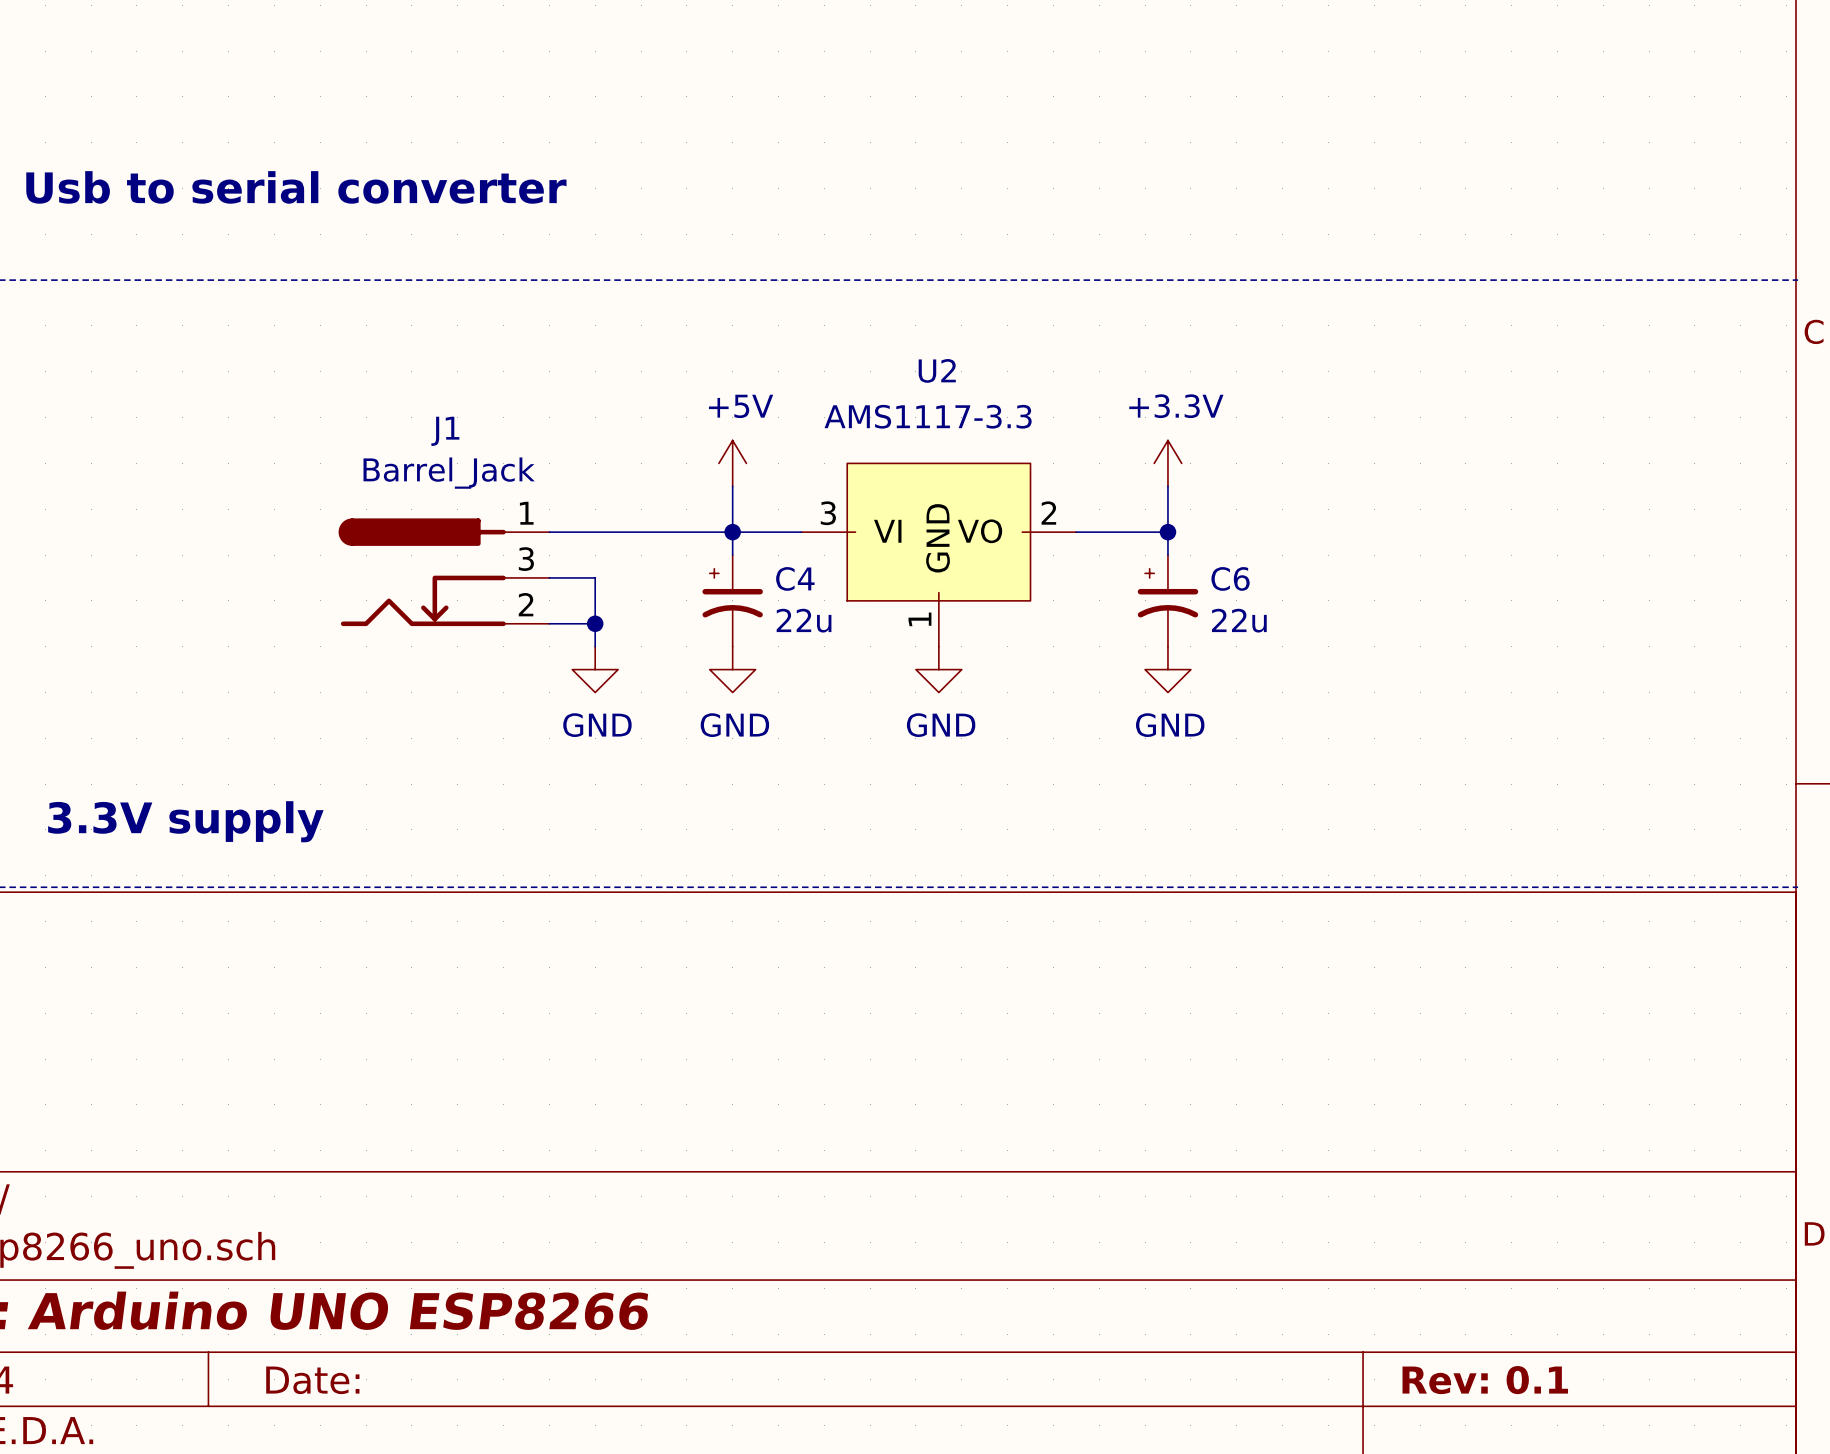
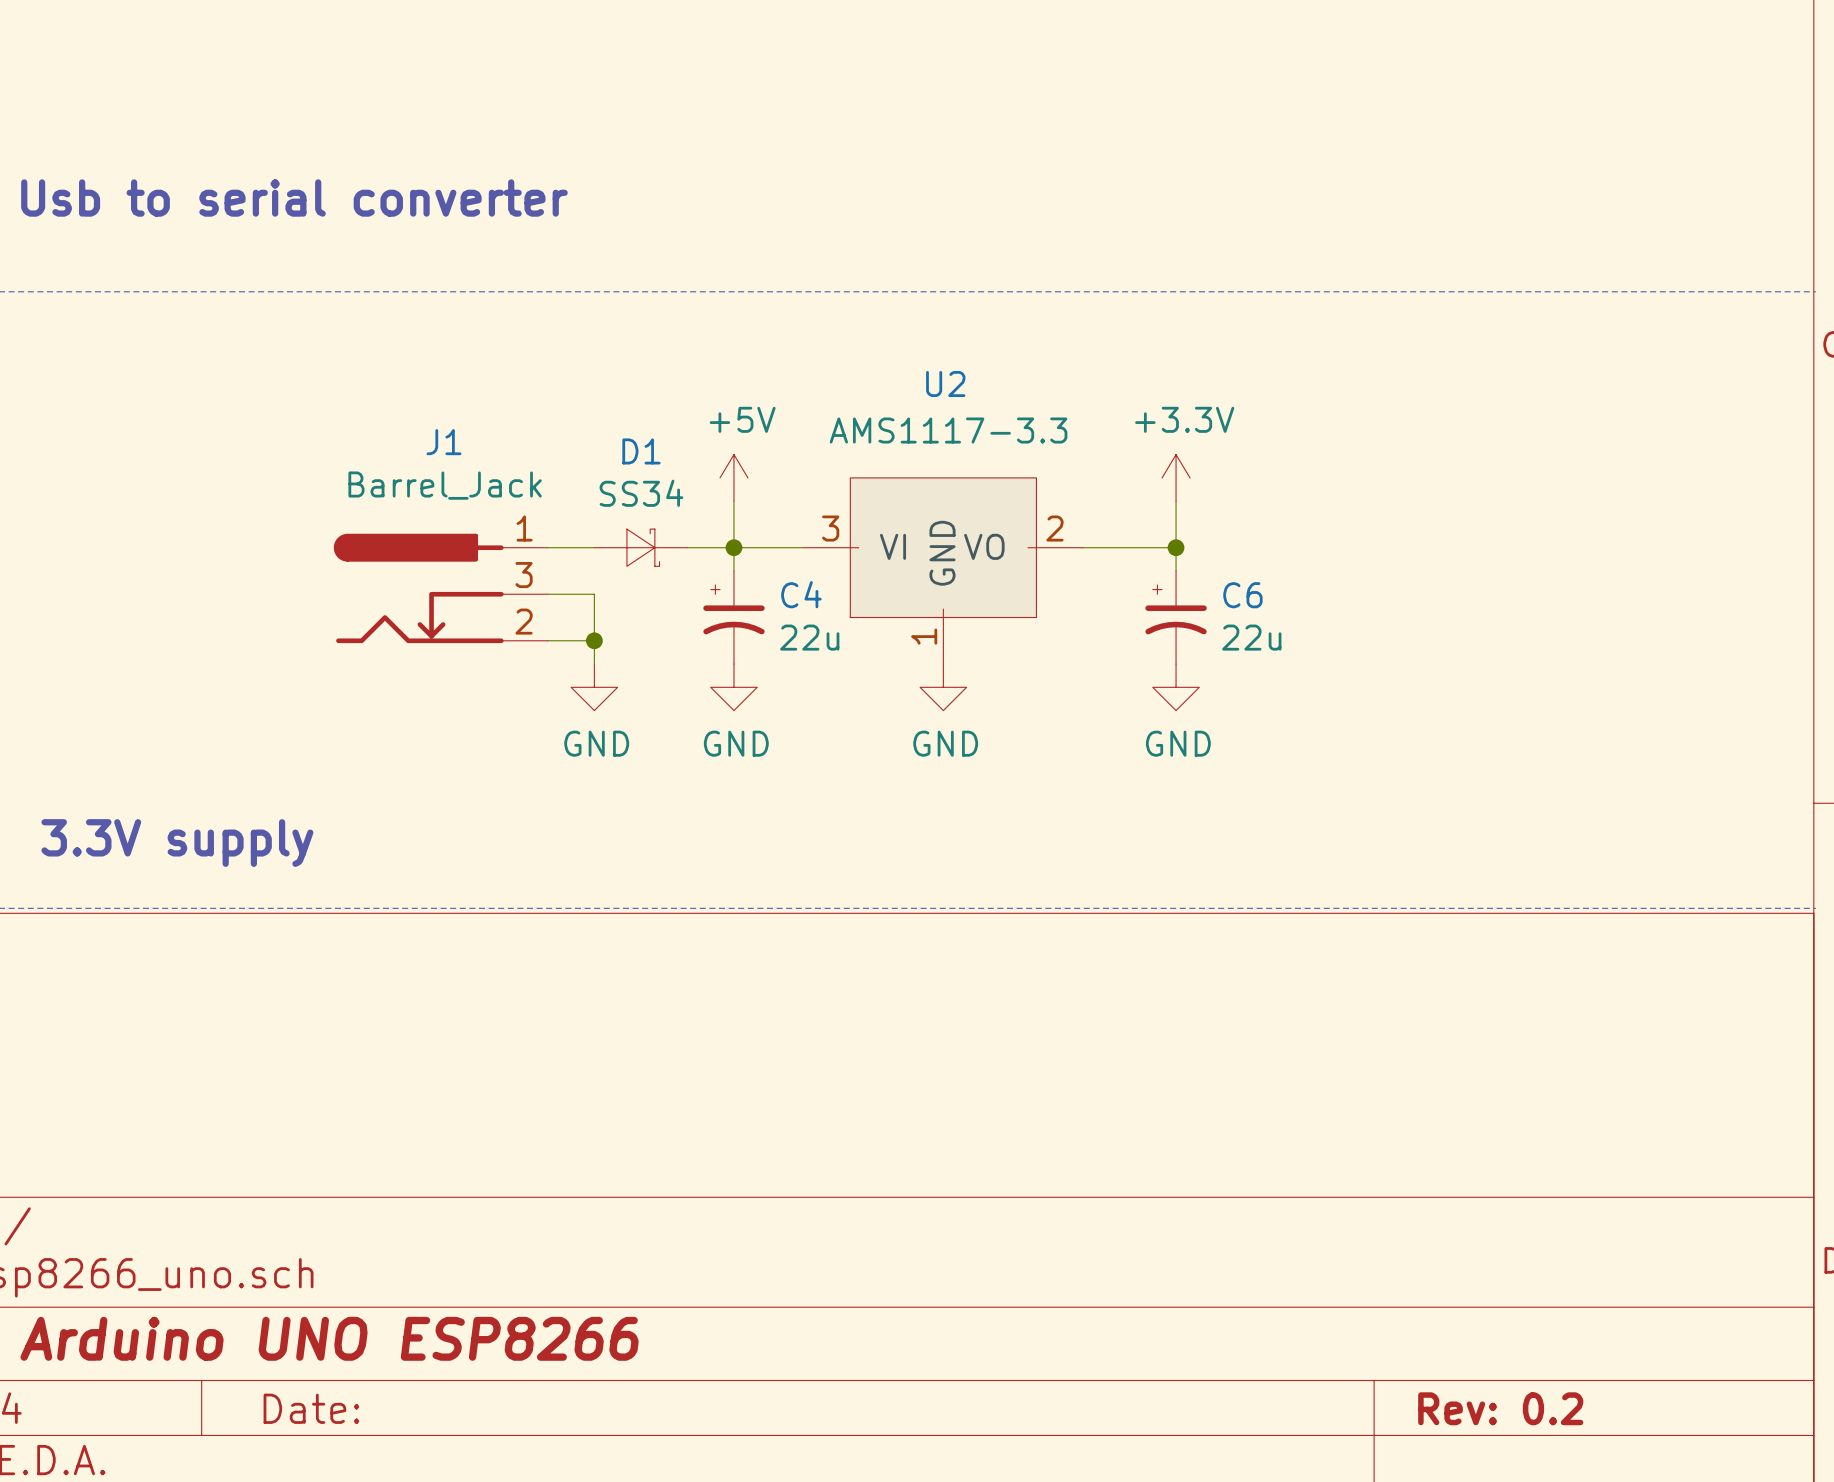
D1: none -> SS34 (640, 547)
title block: Rev: 0.1 (1485, 1380) -> Rev: 0.2 (1500, 1408)

